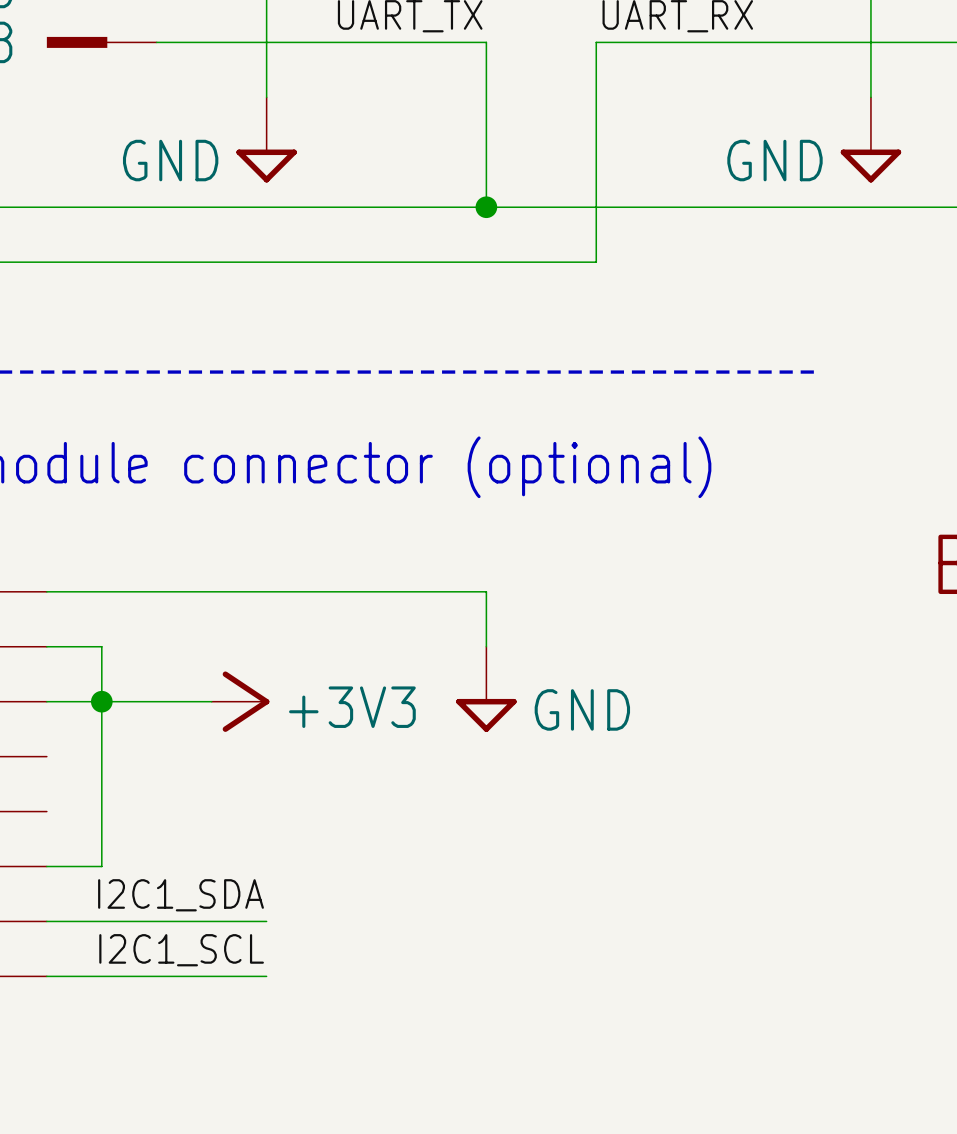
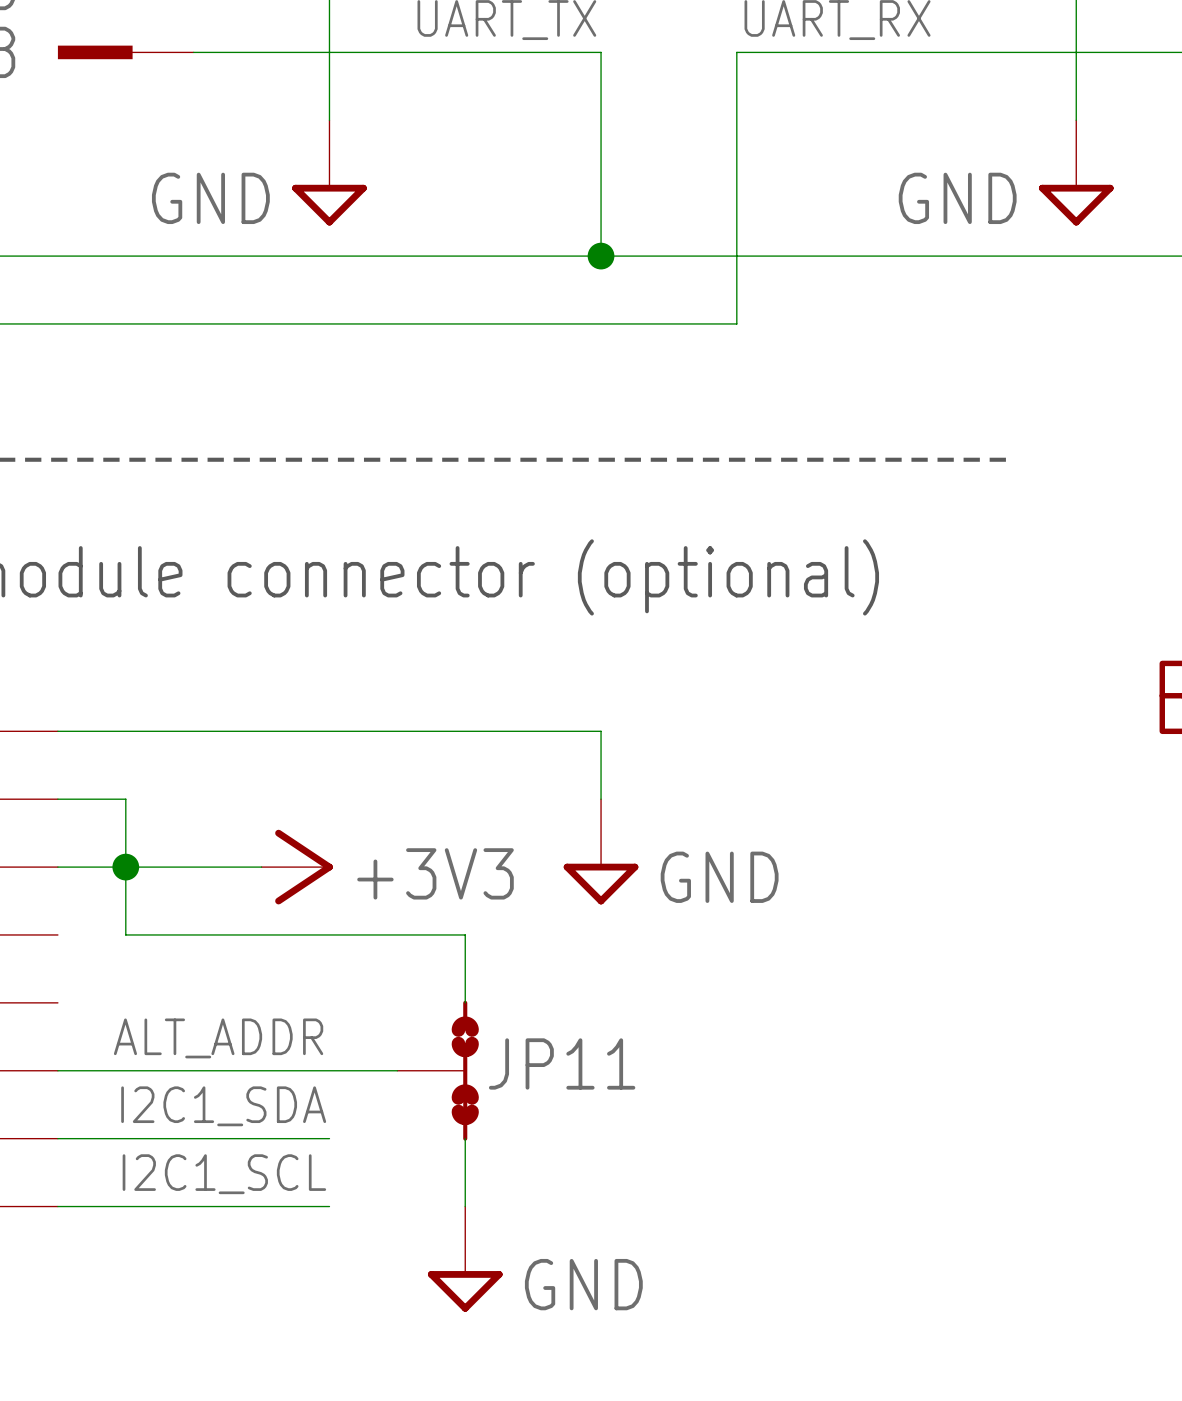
wire: (101, 756) (101, 866) -> (397, 1070) (125, 1070)
wire: none -> (125, 934) (465, 934) (465, 1002)
label: none -> ALT_ADDR (218, 1038)
JP11: none -> (438, 1070)
wire: none -> (465, 1138) (465, 1206)
power symbol: none -> GND (465, 1259)

